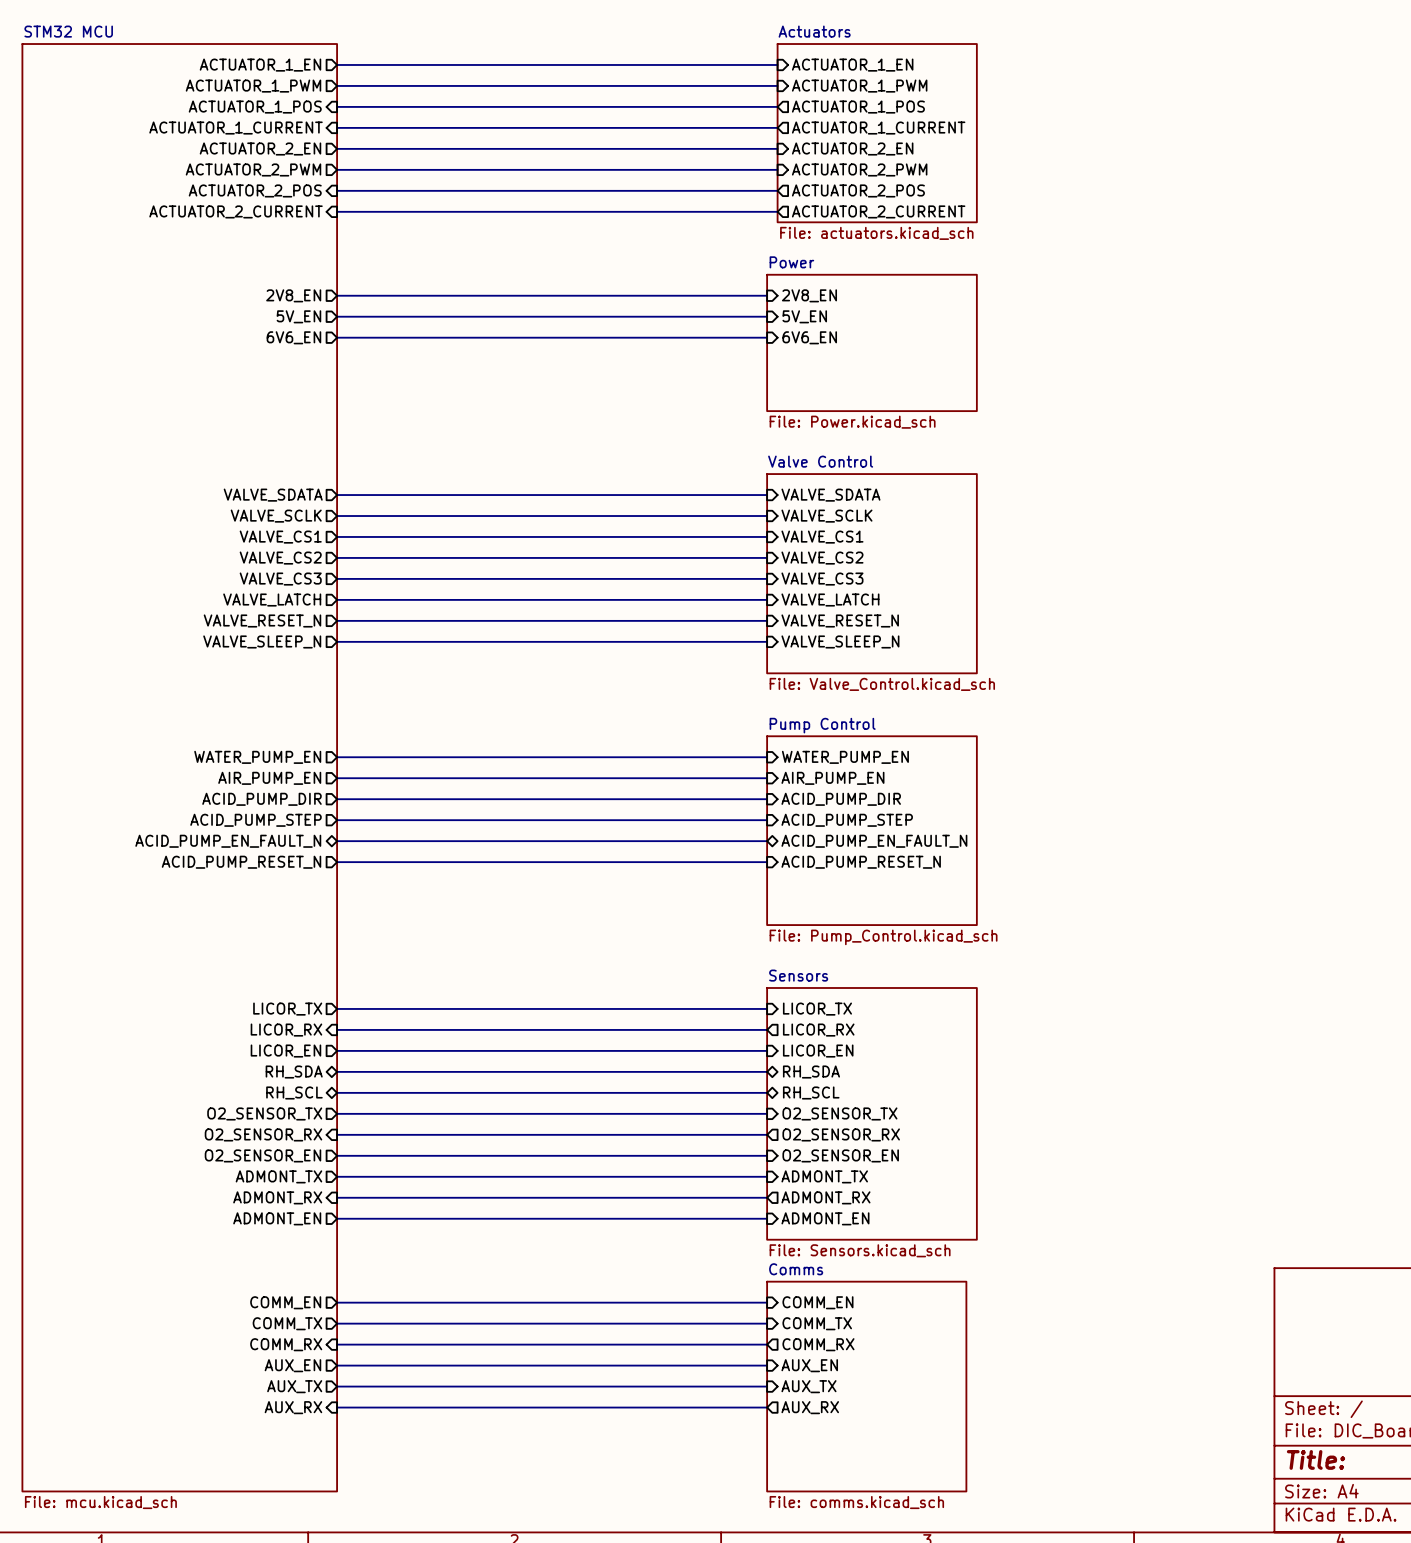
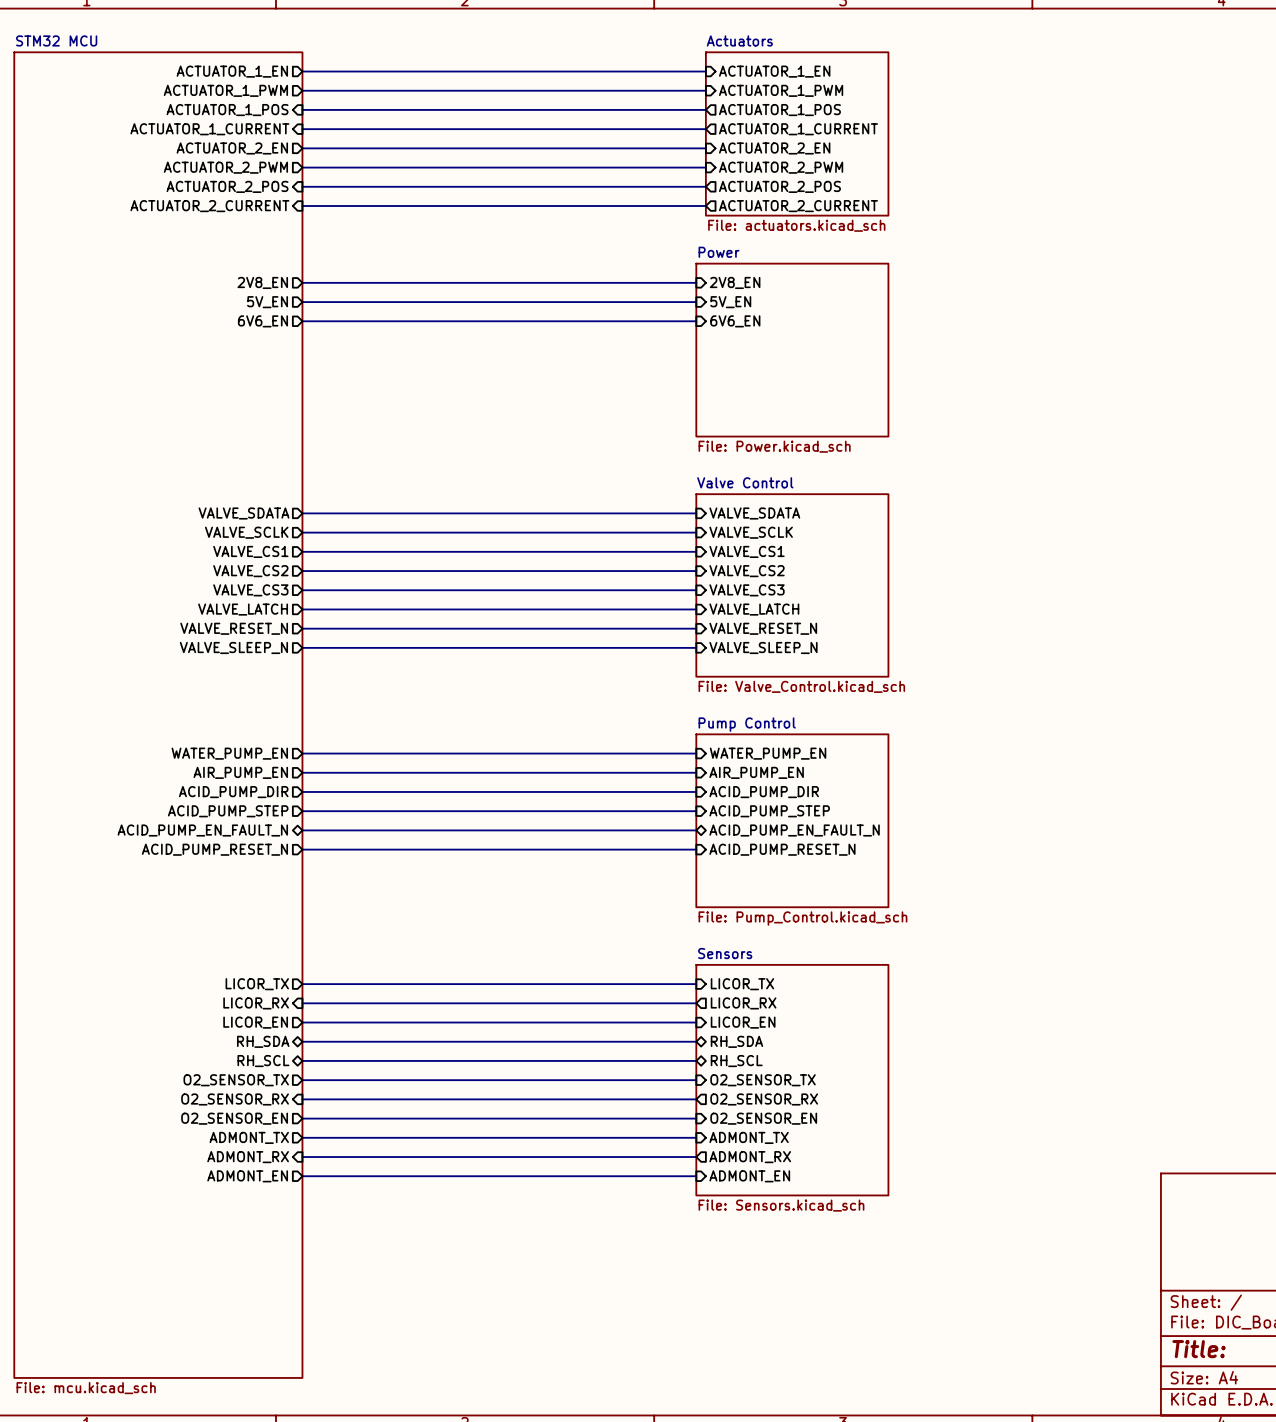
sheet Power: File: Power.kicad_sch (871, 342) -> none
sheet Power: none -> File: Power.kicad_sch (792, 350)
sheet pin position: VALVE_SDATA (273, 495) -> VALVE_SDATA (243, 513)
wire: (337, 495) (767, 495) -> (302, 513) (696, 513)
sheet pin position: VALVE_SDATA (830, 495) -> VALVE_SDATA (754, 513)
sheet pin position: VALVE_SCLK (276, 516) -> VALVE_SCLK (246, 532)
wire: (337, 516) (767, 516) -> (302, 532) (696, 532)
sheet pin position: VALVE_SCLK (826, 516) -> VALVE_SCLK (751, 532)
wire: (337, 536) (767, 536) -> (302, 551) (696, 551)
sheet pin position: VALVE_CS1 (280, 537) -> VALVE_CS1 (250, 551)
sheet pin position: VALVE_CS1 (822, 537) -> VALVE_CS1 (747, 551)
wire: (337, 557) (767, 557) -> (302, 571) (696, 571)
sheet pin position: VALVE_CS2 (280, 558) -> VALVE_CS2 (250, 571)
sheet pin position: VALVE_CS2 (822, 558) -> VALVE_CS2 (747, 571)
sheet Valve Control position: (871, 573) -> (792, 585)
wire: (337, 578) (767, 578) -> (302, 590) (696, 590)
sheet pin position: VALVE_CS3 (280, 579) -> VALVE_CS3 (250, 590)
sheet pin position: VALVE_CS3 (822, 579) -> VALVE_CS3 (747, 590)
wire: (337, 599) (767, 599) -> (302, 609) (696, 609)
sheet pin position: VALVE_LATCH (272, 600) -> VALVE_LATCH (243, 609)
sheet pin position: VALVE_LATCH (830, 600) -> VALVE_LATCH (754, 609)
wire: (337, 620) (767, 620) -> (302, 628) (696, 628)
sheet pin position: VALVE_RESET_N (262, 621) -> VALVE_RESET_N (234, 628)
sheet pin position: VALVE_RESET_N (840, 621) -> VALVE_RESET_N (763, 628)
sheet pin position: VALVE_SLEEP_N (262, 641) -> VALVE_SLEEP_N (233, 647)
wire: (337, 641) (767, 641) -> (302, 647) (696, 647)
sheet pin position: VALVE_SLEEP_N (840, 641) -> VALVE_SLEEP_N (763, 647)
sheet pin position: WATER_PUMP_EN (257, 757) -> WATER_PUMP_EN (229, 753)
wire: (337, 757) (767, 757) -> (302, 753) (696, 753)
sheet pin position: WATER_PUMP_EN (845, 757) -> WATER_PUMP_EN (768, 753)
sheet pin position: AIR_PUMP_EN (269, 778) -> AIR_PUMP_EN (240, 772)
wire: (337, 778) (767, 778) -> (302, 772) (696, 772)
sheet pin position: AIR_PUMP_EN (832, 778) -> AIR_PUMP_EN (756, 772)
sheet pin position: ACID_PUMP_DIR (261, 799) -> ACID_PUMP_DIR (233, 792)
wire: (337, 799) (767, 799) -> (302, 791) (696, 791)
sheet pin position: ACID_PUMP_DIR (841, 799) -> ACID_PUMP_DIR (764, 792)
sheet pin position: ACID_PUMP_STEP (255, 820) -> ACID_PUMP_STEP (228, 811)
wire: (337, 820) (767, 820) -> (302, 811) (696, 811)
sheet pin position: ACID_PUMP_STEP (847, 820) -> ACID_PUMP_STEP (769, 811)
sheet Pump Control position: (871, 830) -> (792, 820)
sheet pin position: ACID_PUMP_EN_FAULT_N (228, 841) -> ACID_PUMP_EN_FAULT_N (202, 830)
wire: (337, 841) (767, 841) -> (302, 830) (696, 830)
sheet pin position: ACID_PUMP_EN_FAULT_N (874, 841) -> ACID_PUMP_EN_FAULT_N (794, 830)
sheet pin position: ACID_PUMP_RESET_N (241, 862) -> ACID_PUMP_RESET_N (214, 849)
wire: (337, 862) (767, 862) -> (302, 849) (696, 849)
sheet pin position: ACID_PUMP_RESET_N (861, 862) -> ACID_PUMP_RESET_N (782, 849)
wire: (337, 1008) (767, 1008) -> (302, 984) (696, 984)
sheet pin position: LICOR_TX (287, 1009) -> LICOR_TX (257, 984)
sheet pin position: LICOR_TX (817, 1009) -> LICOR_TX (742, 984)
wire: (337, 1029) (767, 1029) -> (302, 1003) (696, 1003)
sheet pin position: LICOR_RX (286, 1030) -> LICOR_RX (256, 1003)
sheet pin position: LICOR_RX (818, 1030) -> LICOR_RX (743, 1003)
wire: (337, 1050) (767, 1050) -> (302, 1022) (696, 1022)
sheet pin position: LICOR_EN (285, 1051) -> LICOR_EN (255, 1022)
sheet pin position: LICOR_EN (818, 1051) -> LICOR_EN (743, 1022)
wire: (337, 1071) (767, 1071) -> (302, 1041) (696, 1041)
sheet pin position: RH_SDA (294, 1072) -> RH_SDA (263, 1041)
sheet pin position: RH_SDA (811, 1072) -> RH_SDA (736, 1041)
sheet pin position: RH_SCL (294, 1092) -> RH_SCL (263, 1061)
wire: (337, 1092) (767, 1092) -> (302, 1060) (696, 1060)
sheet pin position: RH_SCL (811, 1092) -> RH_SCL (736, 1061)
sheet pin position: O2_SENSOR_TX (264, 1113) -> O2_SENSOR_TX (236, 1080)
wire: (337, 1113) (767, 1113) -> (302, 1080) (696, 1080)
sheet pin position: O2_SENSOR_TX (839, 1113) -> O2_SENSOR_TX (763, 1080)
sheet Sensors position: (871, 1113) -> (792, 1080)
sheet pin position: O2_SENSOR_RX (263, 1134) -> O2_SENSOR_RX (235, 1099)
wire: (337, 1134) (767, 1134) -> (302, 1099) (696, 1099)
sheet pin position: O2_SENSOR_RX (841, 1134) -> O2_SENSOR_RX (764, 1099)
sheet pin position: O2_SENSOR_EN (262, 1155) -> O2_SENSOR_EN (234, 1118)
wire: (337, 1155) (767, 1155) -> (302, 1118) (696, 1118)
sheet pin position: O2_SENSOR_EN (840, 1155) -> O2_SENSOR_EN (763, 1118)
sheet pin position: ADMONT_TX (278, 1176) -> ADMONT_TX (249, 1137)
wire: (337, 1176) (767, 1176) -> (302, 1137) (696, 1137)
sheet pin position: ADMONT_TX (824, 1176) -> ADMONT_TX (749, 1137)
sheet pin position: ADMONT_RX (277, 1197) -> ADMONT_RX (248, 1157)
wire: (337, 1197) (767, 1197) -> (302, 1157) (696, 1157)
sheet pin position: ADMONT_RX (825, 1197) -> ADMONT_RX (750, 1157)
sheet pin position: ADMONT_EN (277, 1218) -> ADMONT_EN (247, 1176)
wire: (337, 1218) (767, 1218) -> (302, 1176) (696, 1176)
sheet pin position: ADMONT_EN (825, 1218) -> ADMONT_EN (749, 1176)
sheet pin: COMM_EN (285, 1302) -> none
wire: (337, 1302) (767, 1302) -> none
sheet pin: COMM_EN (817, 1302) -> none
sheet pin: COMM_TX (287, 1323) -> none
wire: (337, 1323) (767, 1323) -> none
sheet pin: COMM_TX (817, 1323) -> none
sheet pin: COMM_RX (286, 1344) -> none
wire: (337, 1344) (767, 1344) -> none
sheet pin: COMM_RX (818, 1344) -> none
sheet pin: AUX_EN (292, 1365) -> none
wire: (337, 1365) (767, 1365) -> none
sheet pin: AUX_EN (809, 1365) -> none
sheet pin: AUX_TX (294, 1386) -> none
wire: (337, 1386) (767, 1386) -> none
sheet pin: AUX_TX (808, 1386) -> none
sheet Comms: File: comms.kicad_sch (866, 1386) -> none
sheet pin: AUX_RX (293, 1407) -> none
wire: (337, 1407) (767, 1407) -> none
sheet pin: AUX_RX (810, 1407) -> none

